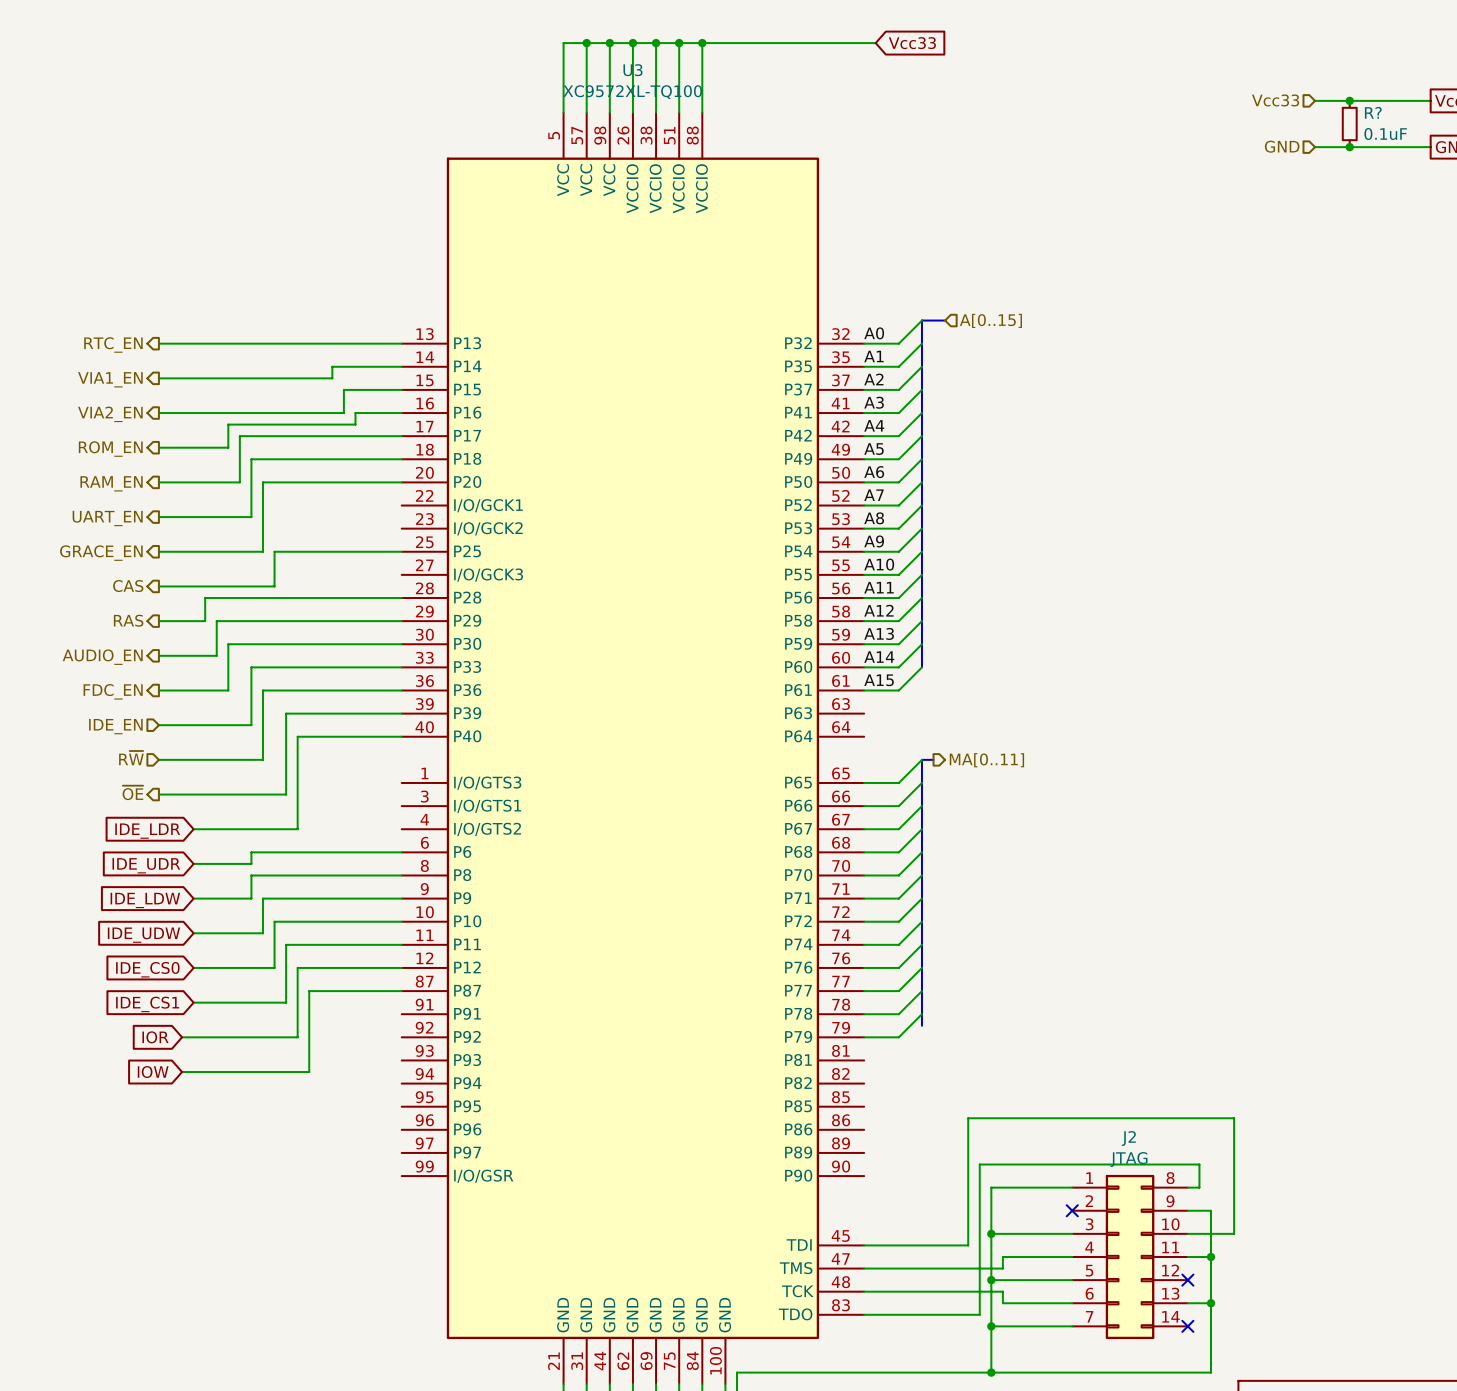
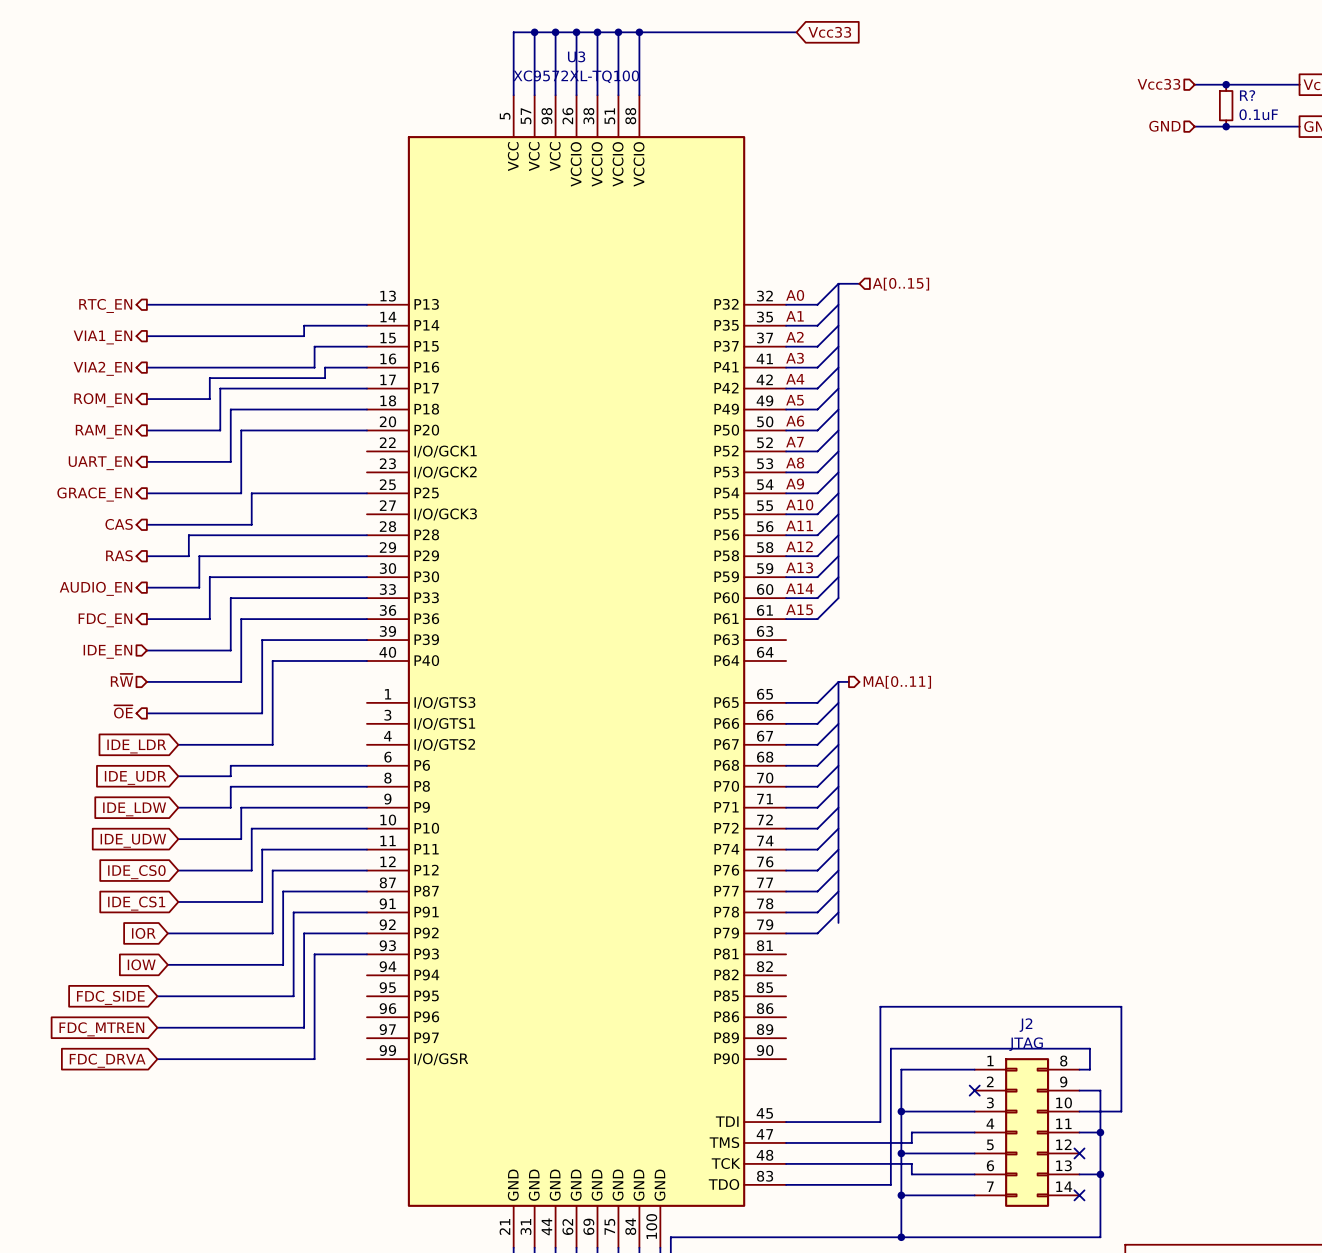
wire: none -> (366, 912) (293, 912) (293, 996) (157, 996)
wire: none -> (366, 933) (304, 933) (304, 1027) (157, 1027)
wire: none -> (366, 954) (314, 954) (314, 1059) (157, 1059)
global label: none -> FDC_SIDE (110, 997)
global label: none -> FDC_MTREN (101, 1029)
global label: none -> FDC_DRVA (107, 1060)

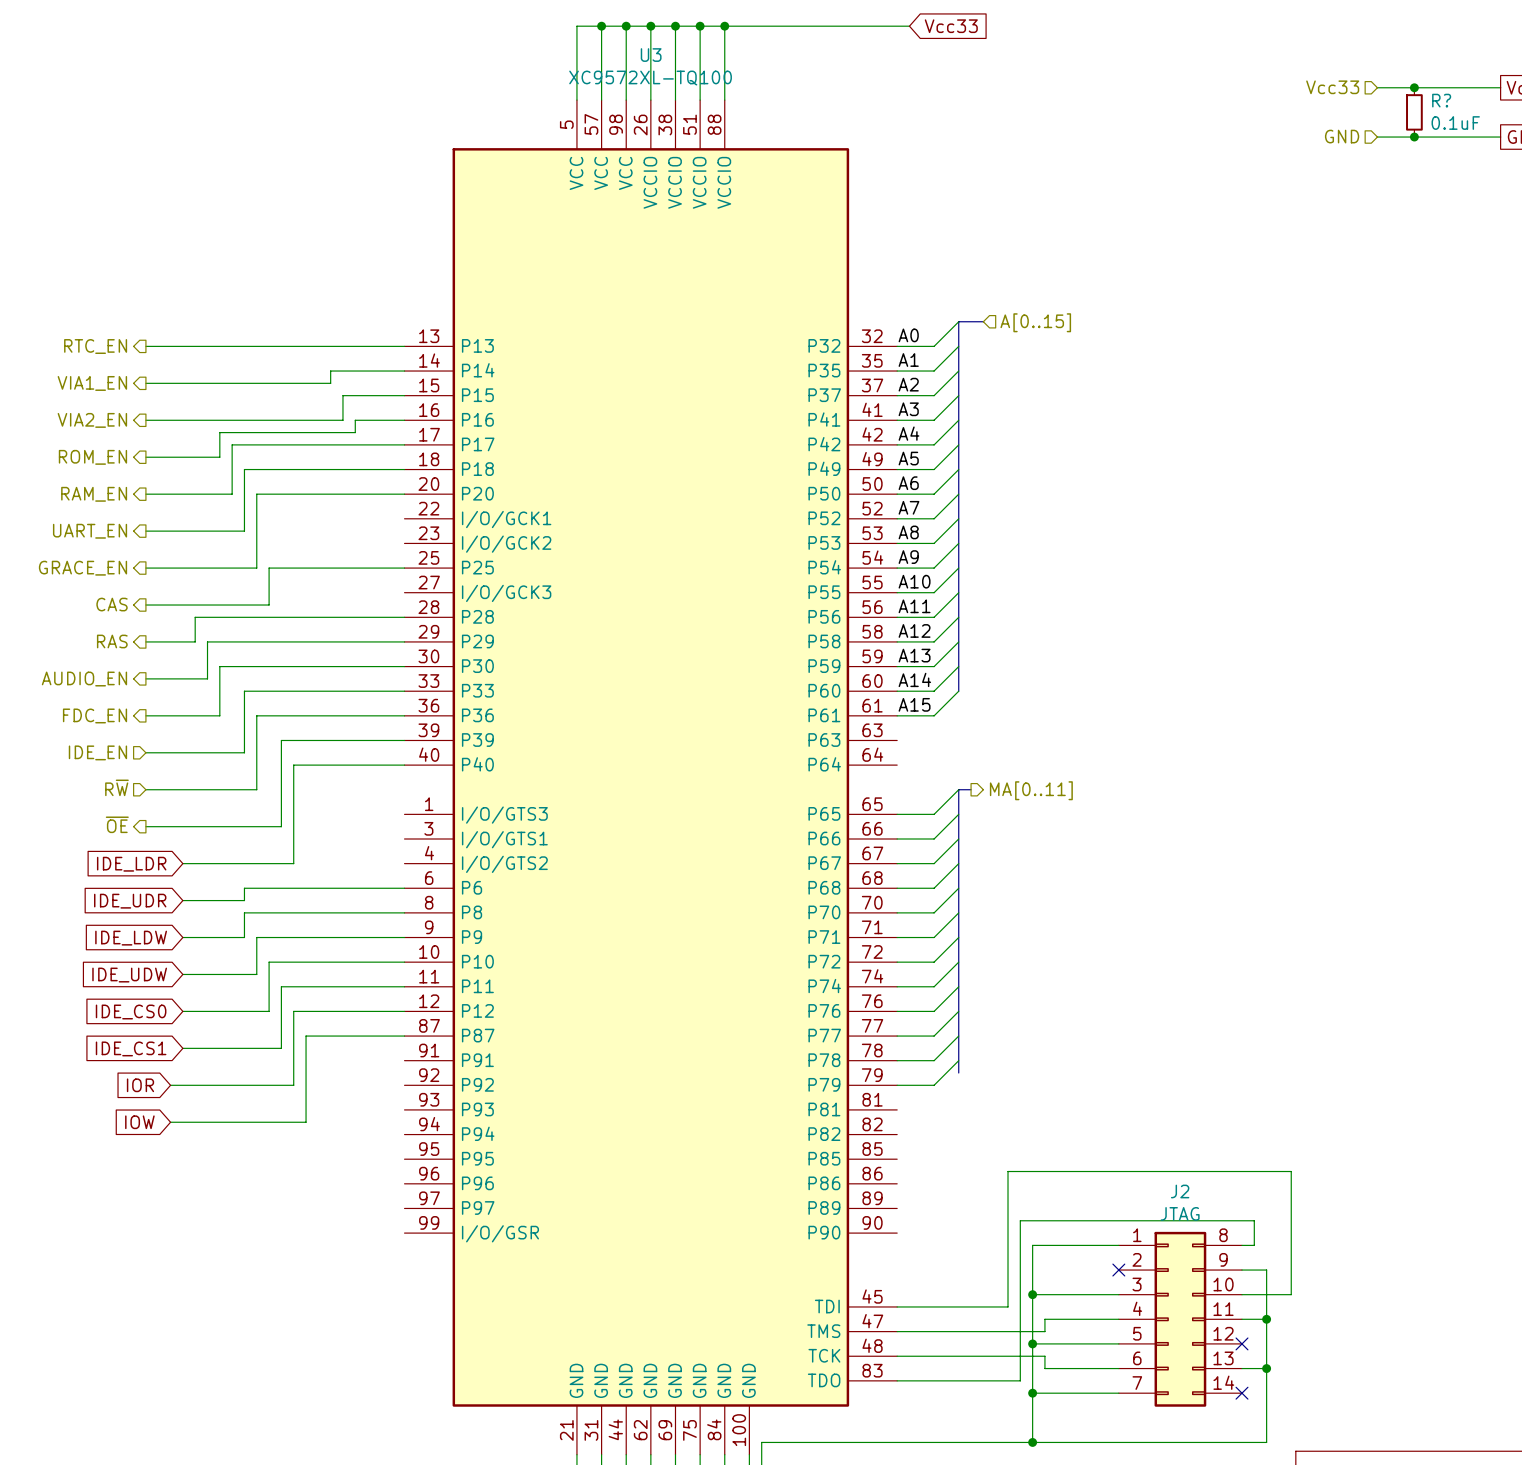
wire: (366, 912) (293, 912) (293, 996) (157, 996) -> none
wire: (366, 933) (304, 933) (304, 1027) (157, 1027) -> none
wire: (366, 954) (314, 954) (314, 1059) (157, 1059) -> none
global label: FDC_SIDE (110, 997) -> none
global label: FDC_MTREN (101, 1029) -> none
global label: FDC_DRVA (107, 1060) -> none

